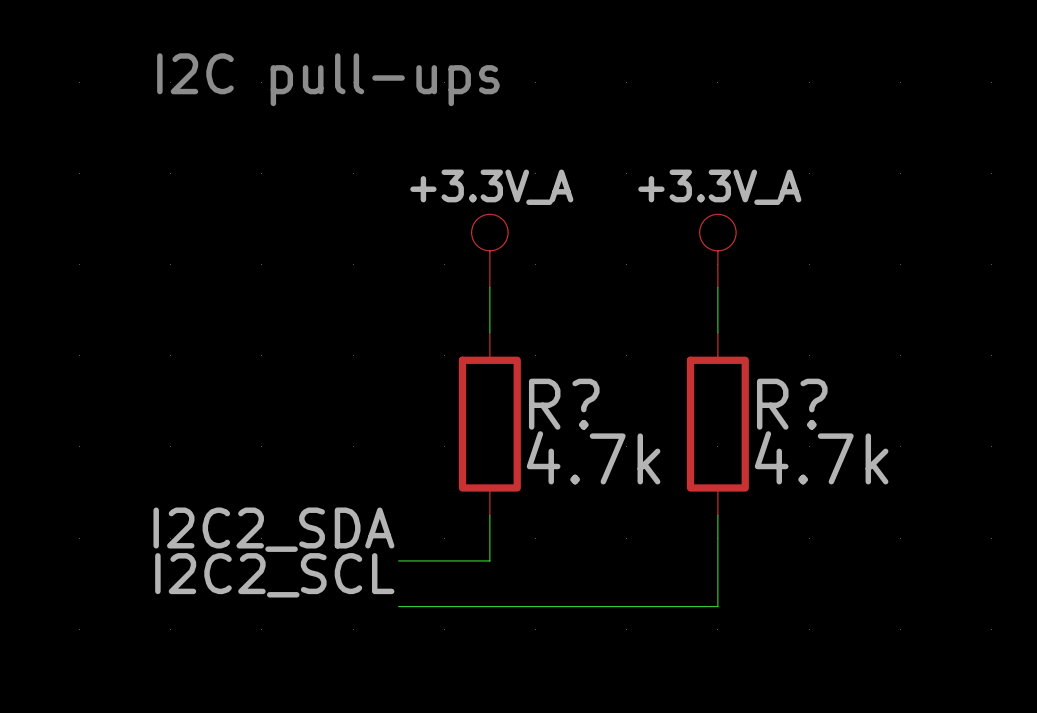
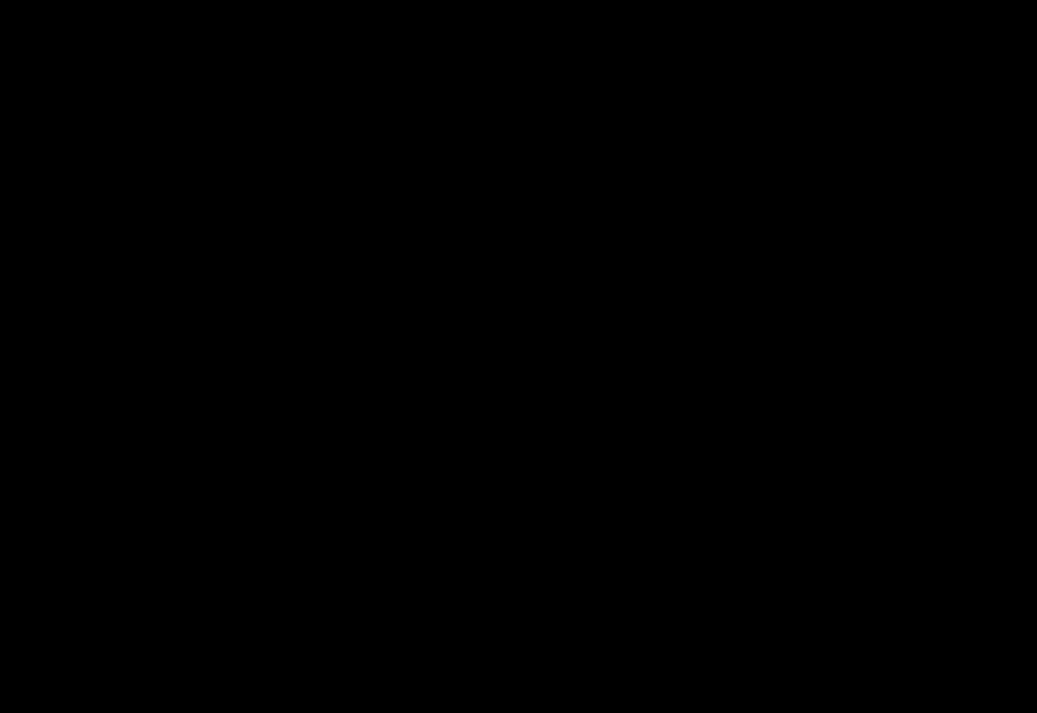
text: I2C pull-ups (328, 79) -> none
power symbol: +3.3V_A (489, 250) -> none
power symbol: +3.3V_A (717, 250) -> none
wire: (489, 287) (489, 332) -> none
wire: (717, 287) (717, 332) -> none
R?: 4.7k (489, 424) -> none
R?: 4.7k (717, 424) -> none
wire: (489, 515) (489, 560) (398, 560) -> none
wire: (717, 515) (717, 606) (398, 606) -> none
label: I2C2_SDA (273, 529) -> none
label: I2C2_SCL (274, 575) -> none

